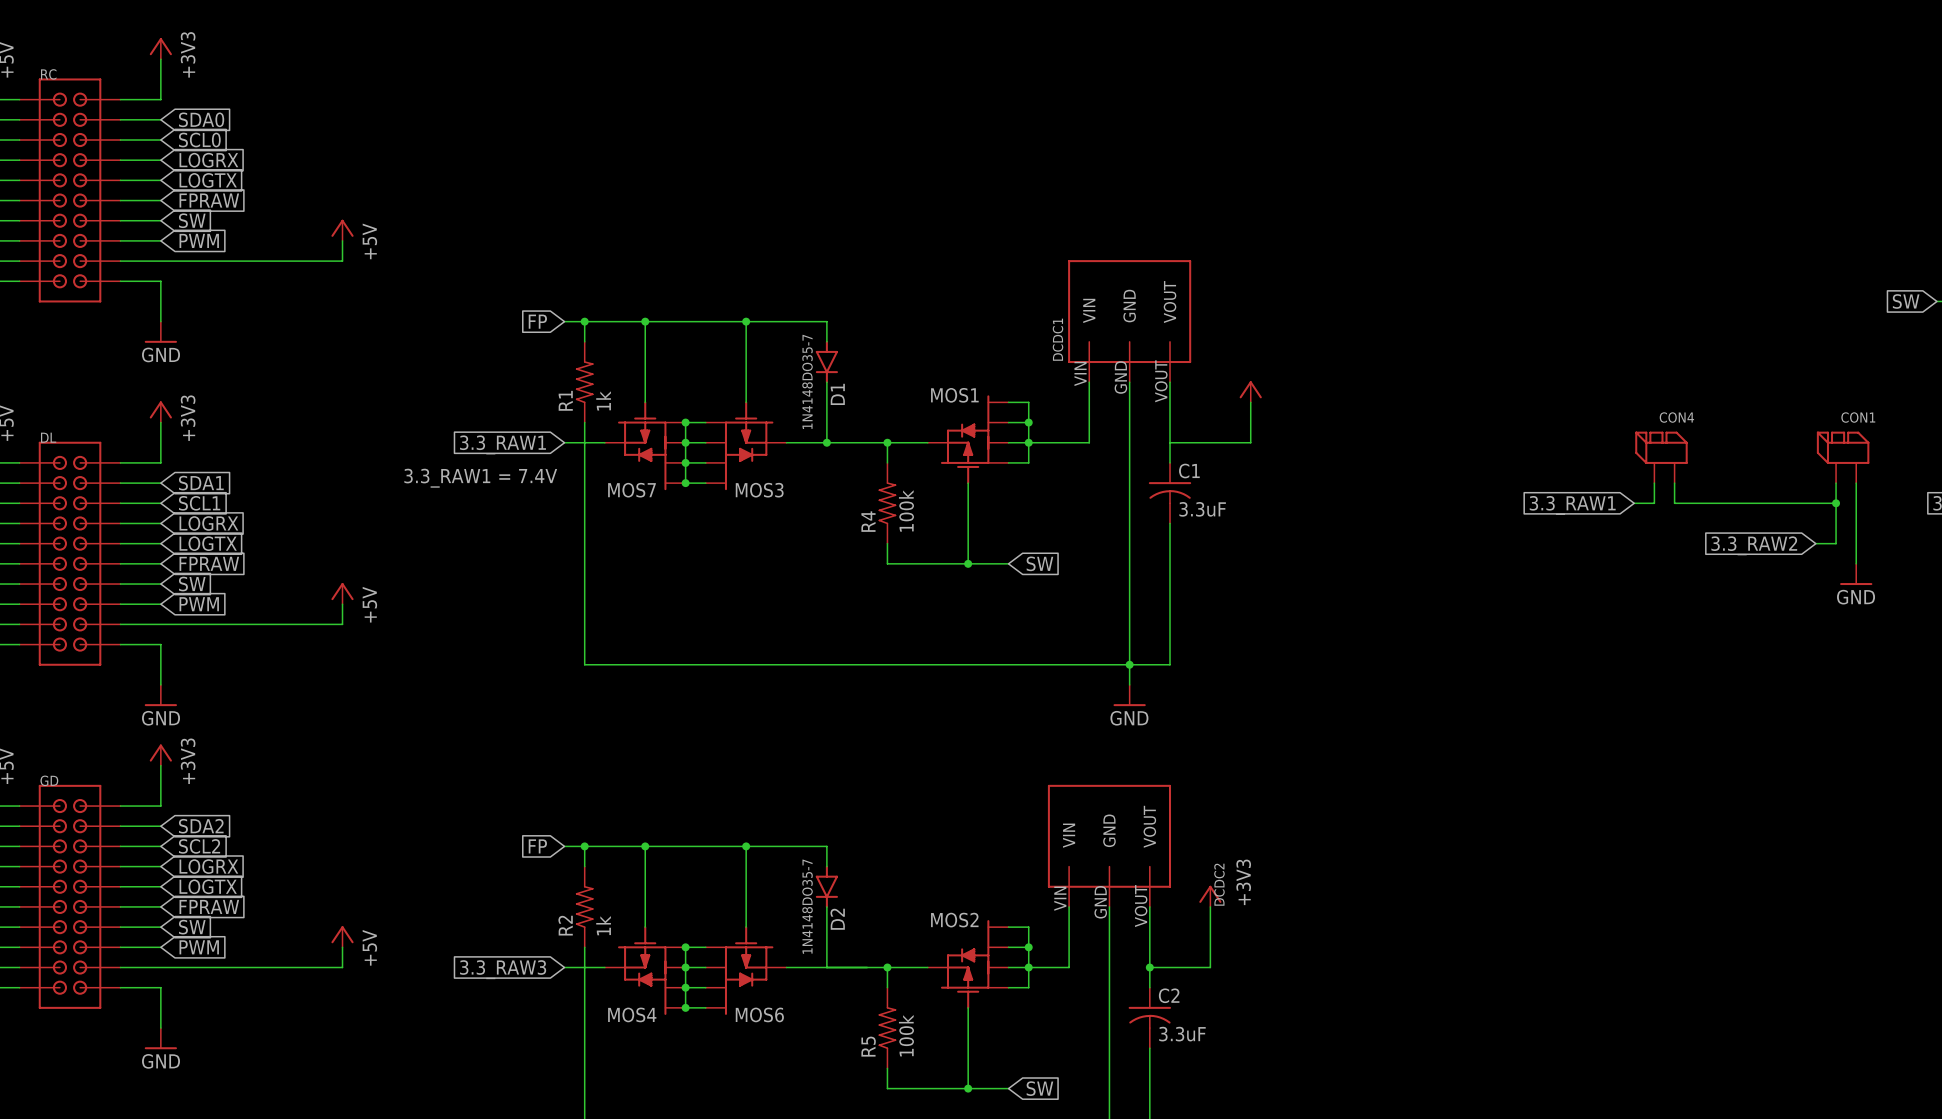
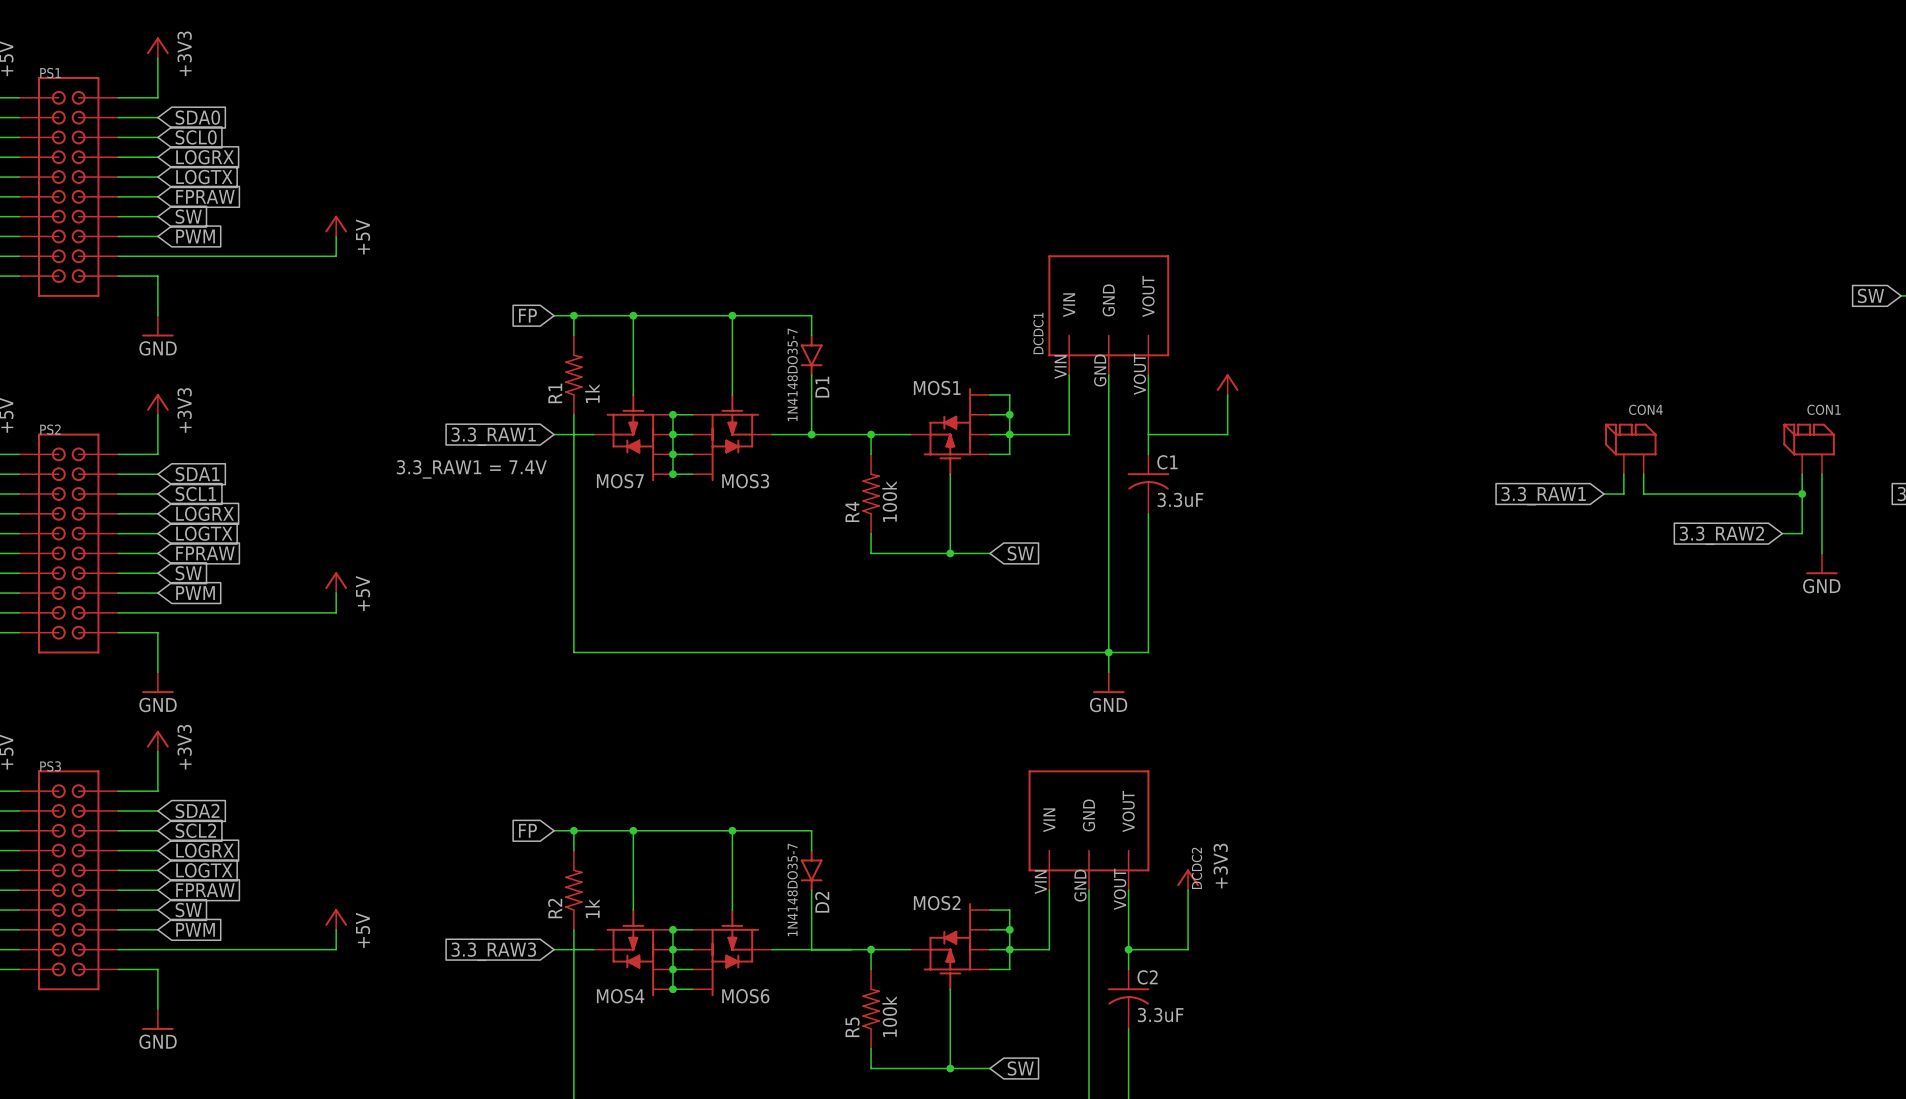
RC name: RC (48, 74) -> PS1 (50, 73)
DL name: DL (48, 437) -> PS2 (50, 429)
GD name: GD (49, 780) -> PS3 (50, 766)

